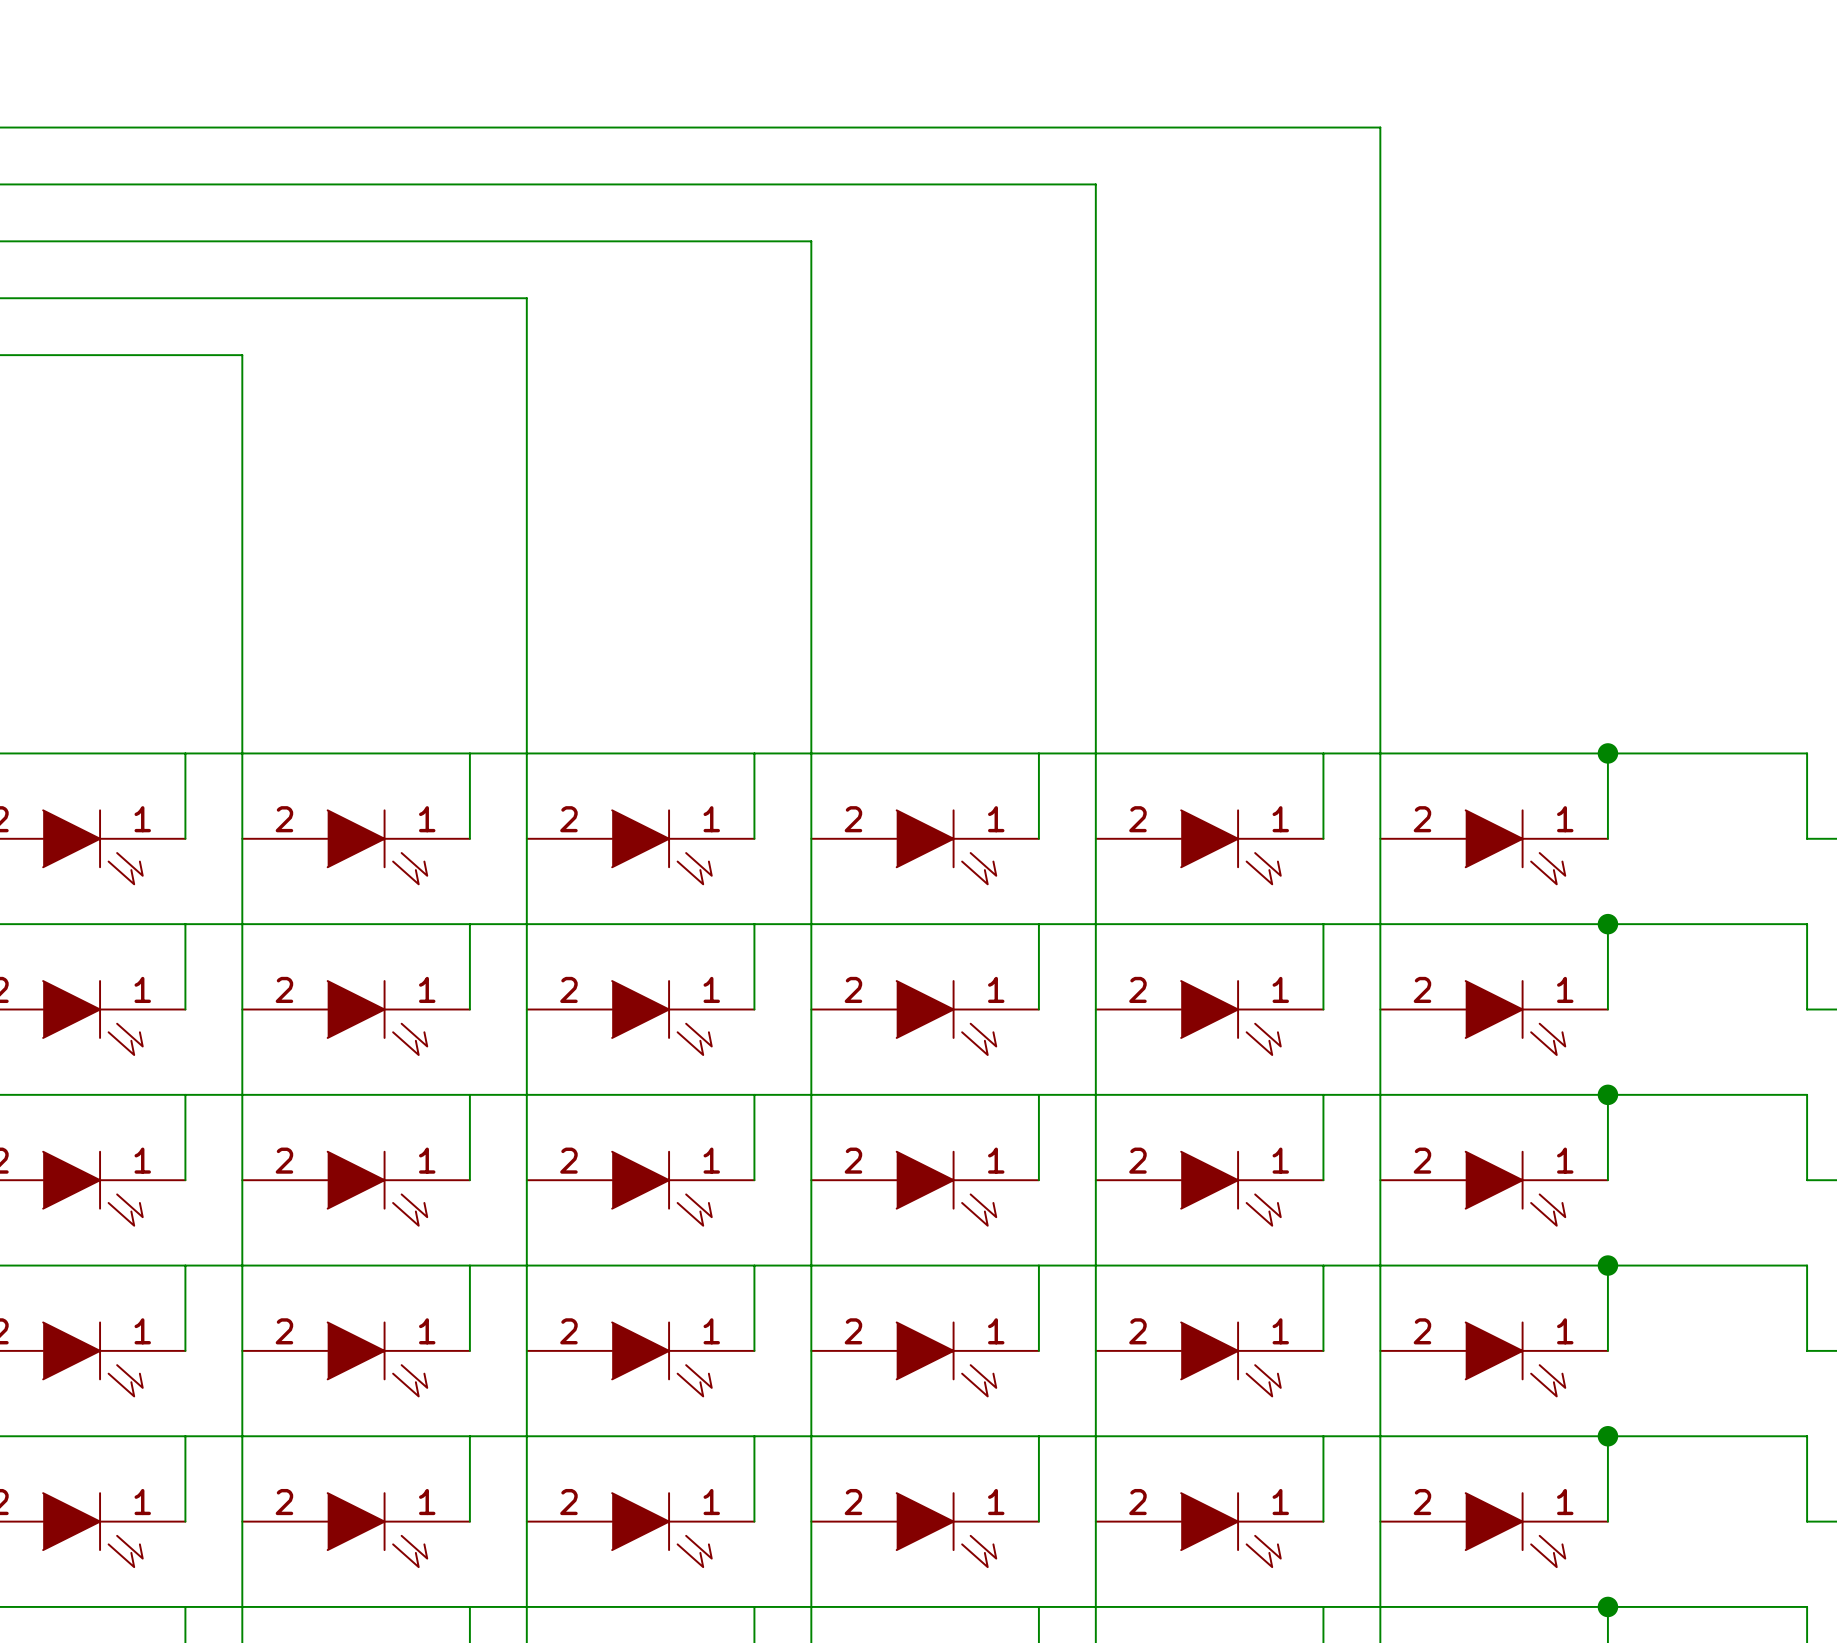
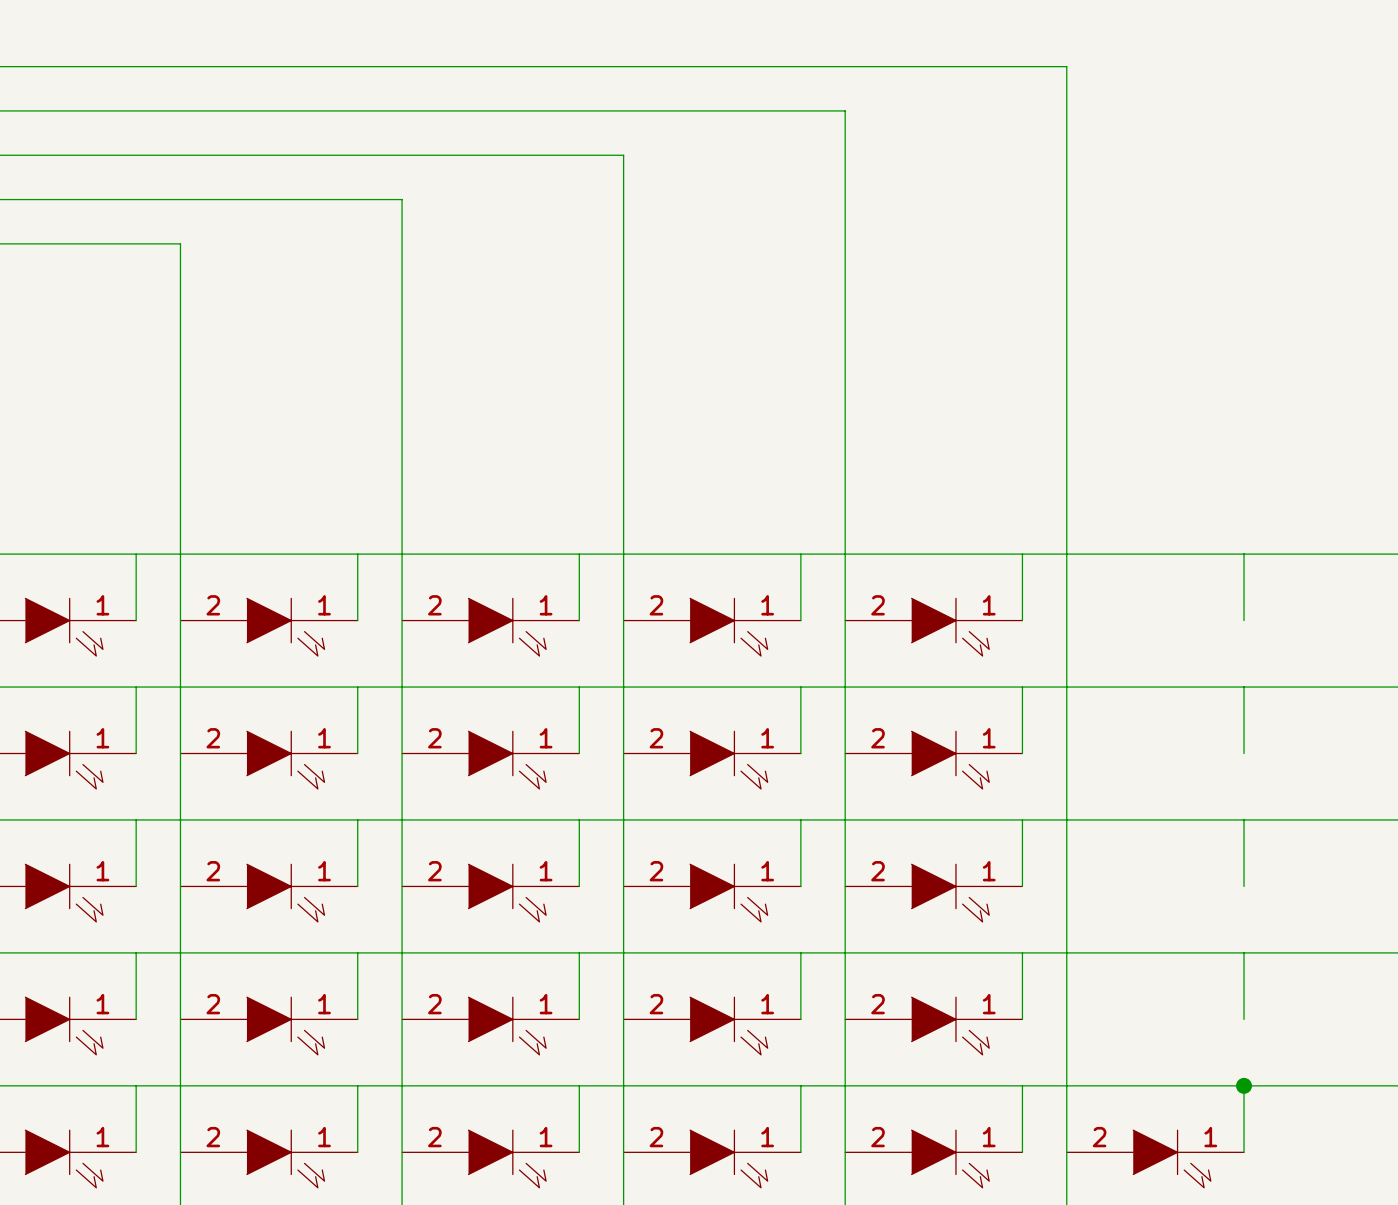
junction: (1607, 753) -> none
part: (1494, 847) -> none
junction: (1607, 924) -> none
part: (1494, 1018) -> none
junction: (1607, 1094) -> none
part: (1494, 1188) -> none
junction: (1607, 1265) -> none
part: (1494, 1359) -> none

